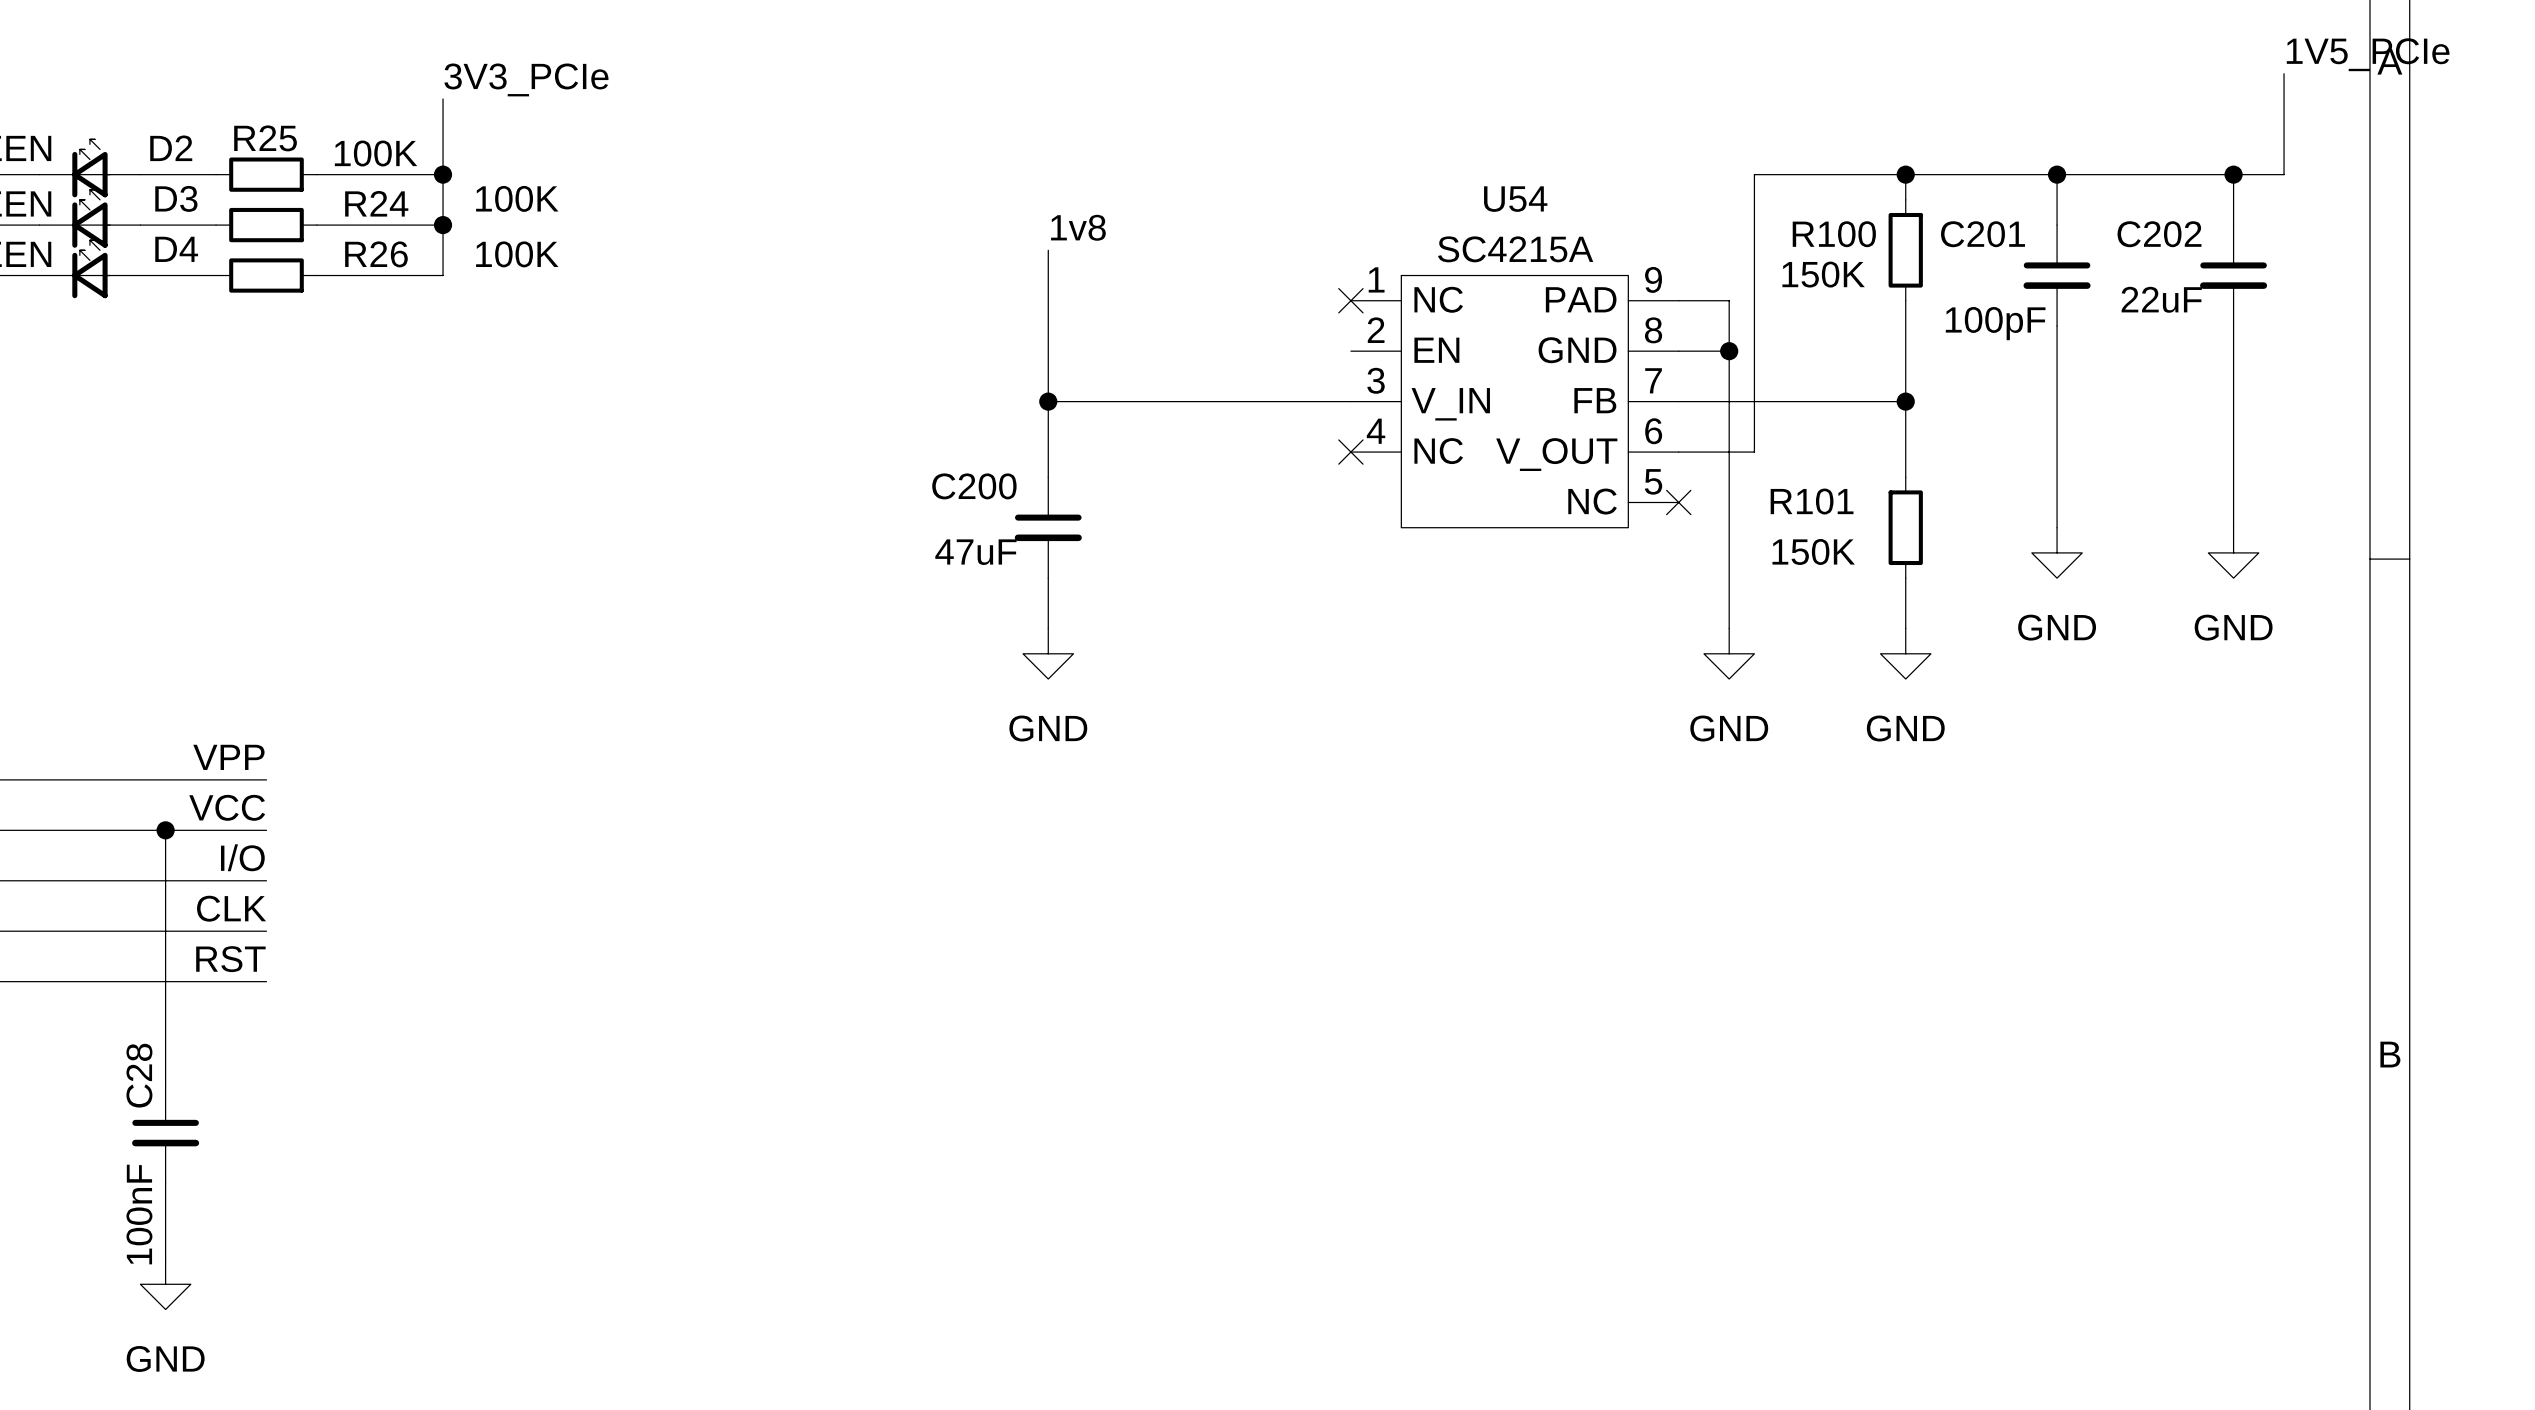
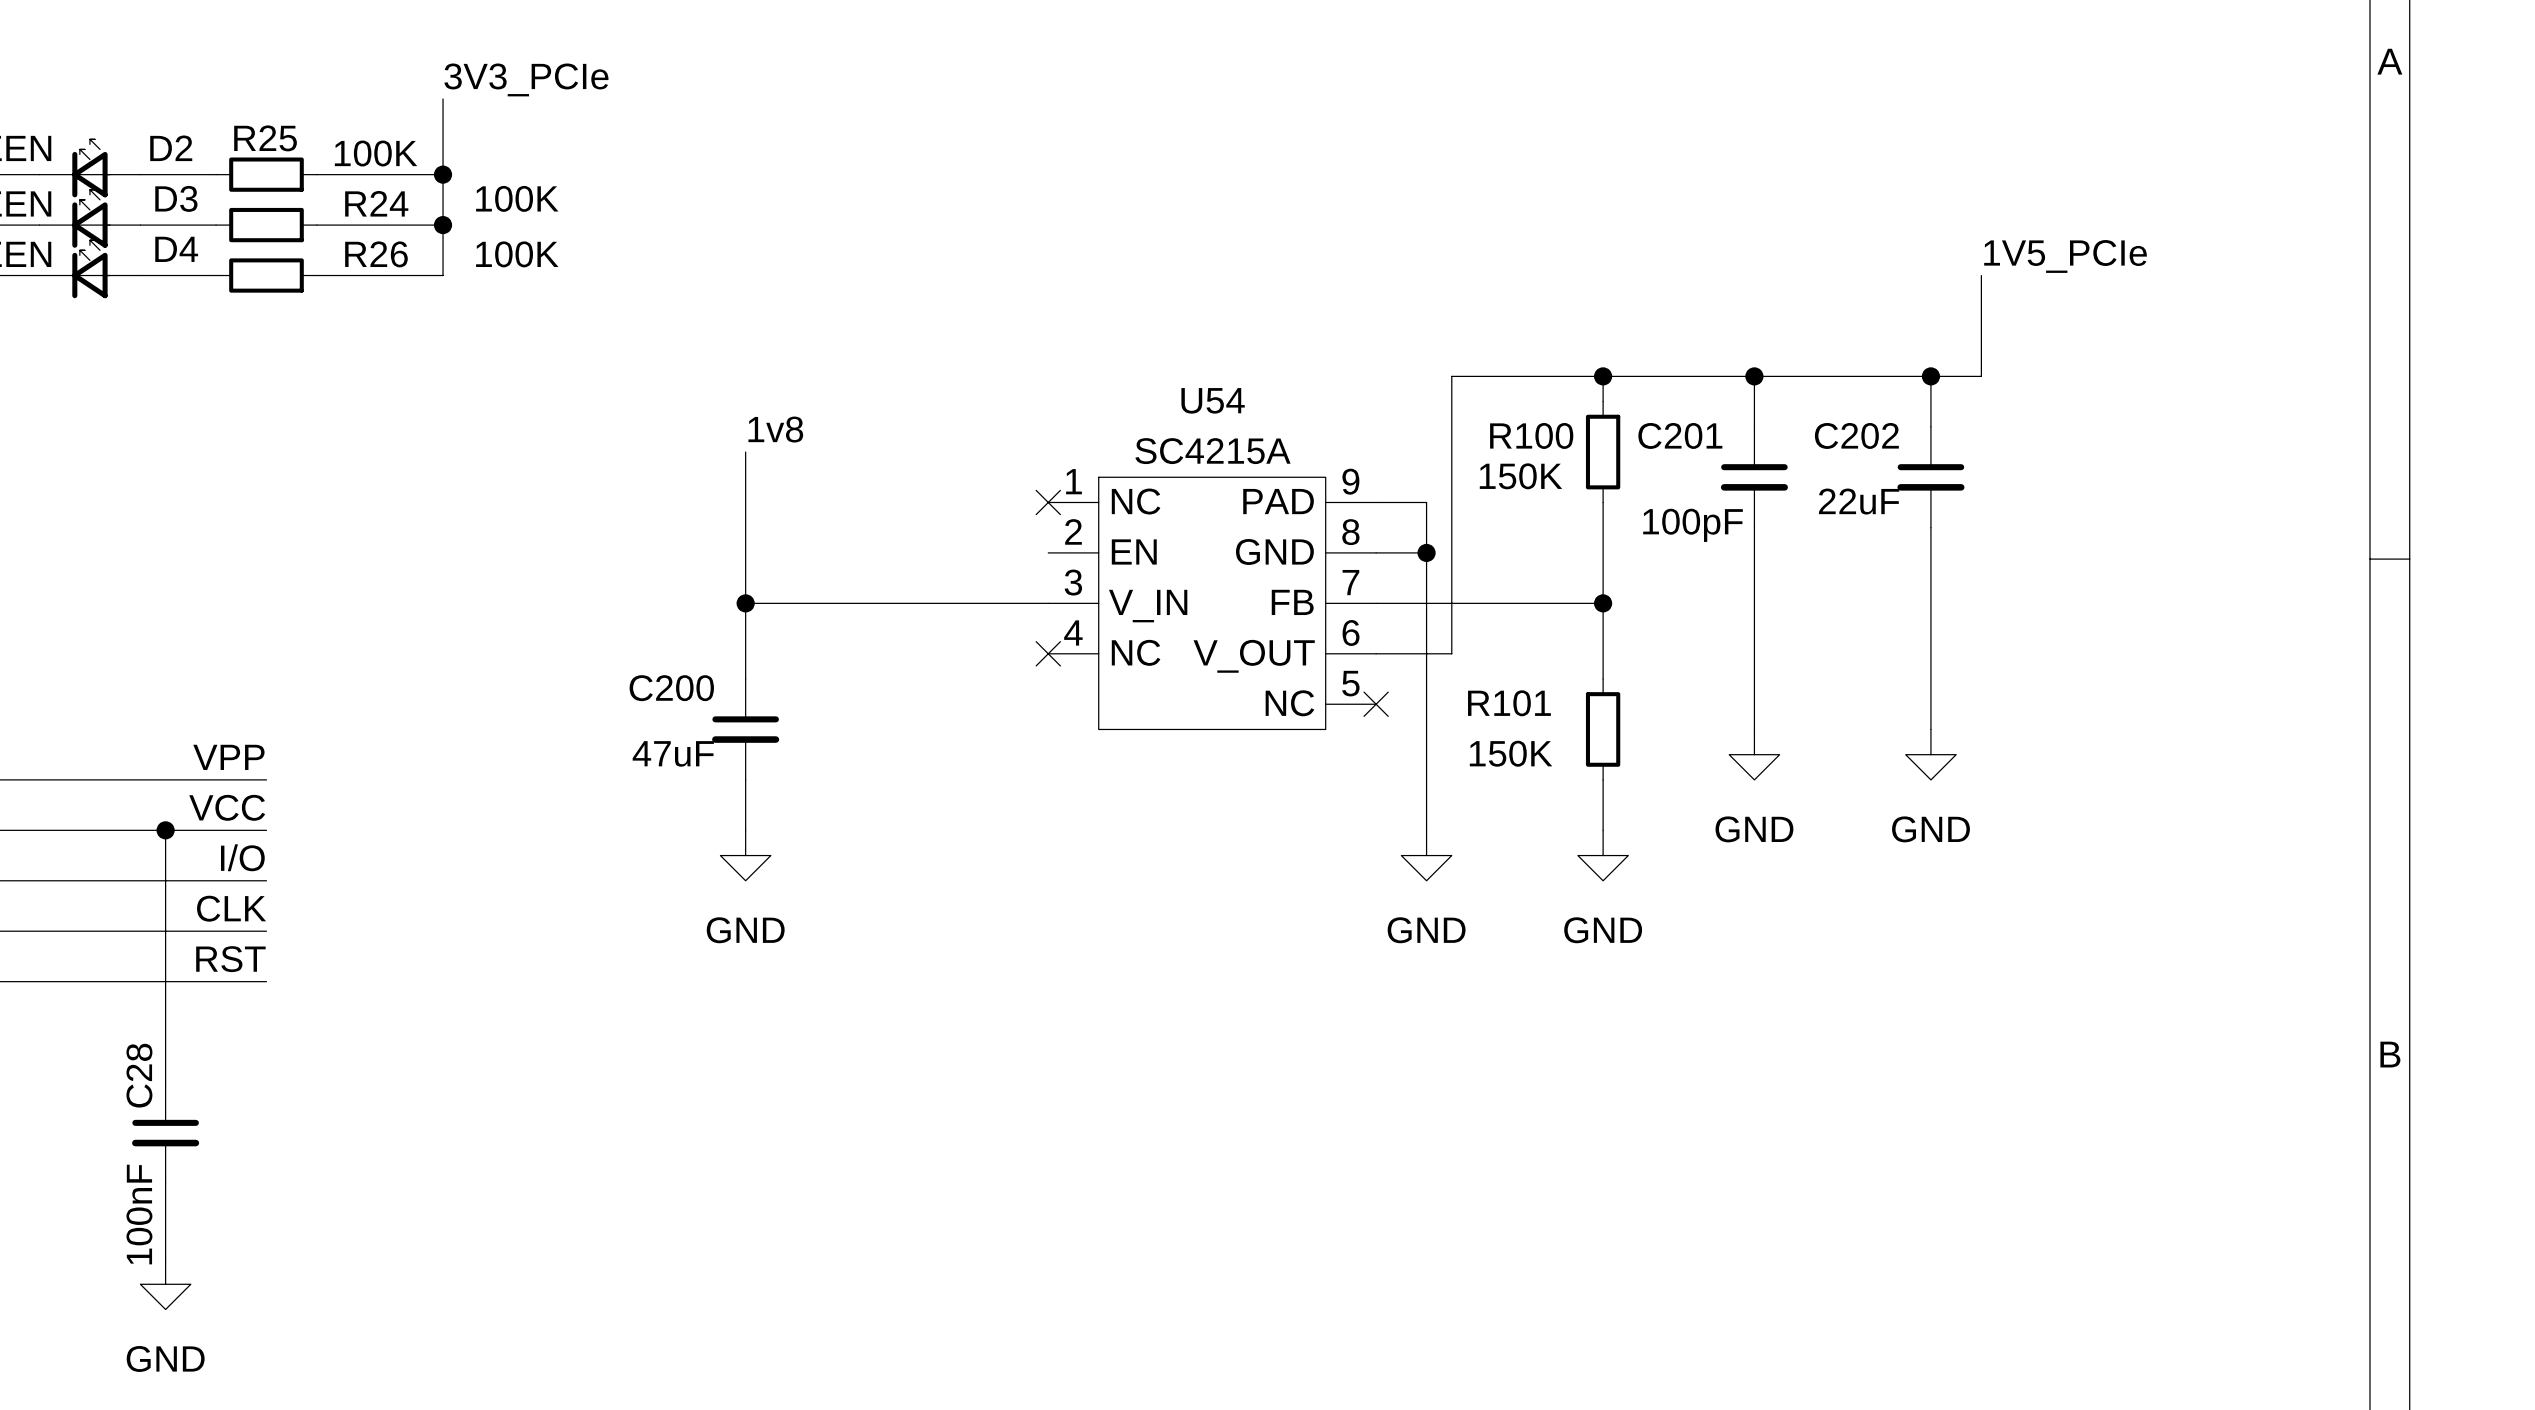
label position: 1V5_PCIe (2368, 54) -> 1V5_PCIe (2065, 256)
wire: (2284, 73) (2284, 174) (1754, 174) (1754, 376) -> none
wire: (1905, 174) (1905, 199) -> (1603, 376) (1603, 401)
junction: (1905, 174) -> none
wire: (2057, 174) (2057, 225) -> none
junction: (2057, 174) -> none
wire: (2233, 174) (2233, 225) -> (1930, 376) (1930, 426)
junction: (2233, 174) -> none
label position: 1v8 (1078, 227) -> 1v8 (775, 429)
wire: (1048, 250) (1048, 477) -> (745, 452) (745, 679)
R100 position: (1905, 250) -> (1603, 452)
wire: none -> (1981, 275) (1981, 376) (1451, 376) (1451, 653) (1376, 653)
C201 position: (2057, 275) -> (1754, 477)
C202 position: (2233, 275) -> (1930, 477)
no-connect mark: (1350, 300) -> none
wire: (1678, 300) (1729, 300) (1729, 628) -> (1376, 502) (1426, 502) (1426, 830)
wire: (1905, 300) (1905, 477) -> (1603, 502) (1603, 679)
wire: (2057, 325) (2057, 527) -> (1754, 527) (1754, 729)
wire: (2233, 325) (2233, 527) -> (1930, 527) (1930, 729)
wire: (1678, 351) (1729, 351) -> (1376, 552) (1426, 552)
junction position: (1729, 351) -> (1754, 376)
junction: none -> (1603, 376)
wire: (1048, 401) (1350, 401) -> (745, 603) (1048, 603)
junction: (1048, 401) -> none
U54 position: (1514, 401) -> (1212, 603)
wire: (1678, 401) (1905, 401) -> (1376, 603) (1603, 603)
junction position: (1905, 401) -> (1930, 376)
wire: (1754, 426) (1754, 452) (1678, 452) -> none
no-connect mark: (1350, 452) -> none
no-connect mark: none -> (1048, 502)
no-connect mark: (1678, 502) -> none
C200 position: (1048, 527) -> (745, 729)
R101 position: (1905, 527) -> (1603, 729)
junction: none -> (1426, 552)
power symbol: GND (2057, 552) -> none
power symbol: GND (2233, 552) -> none
wire: (1048, 578) (1048, 628) -> (745, 779) (745, 830)
wire: (1905, 578) (1905, 628) -> (1603, 779) (1603, 830)
junction: none -> (745, 603)
junction: none -> (1603, 603)
no-connect mark: none -> (1048, 653)
power symbol: GND (1048, 653) -> none
power symbol: GND (1729, 653) -> none
power symbol: GND (1905, 653) -> none
no-connect mark: none -> (1376, 704)
power symbol: none -> GND (1754, 754)
power symbol: none -> GND (1930, 754)
power symbol: none -> GND (745, 855)
power symbol: none -> GND (1426, 855)
power symbol: none -> GND (1603, 855)

